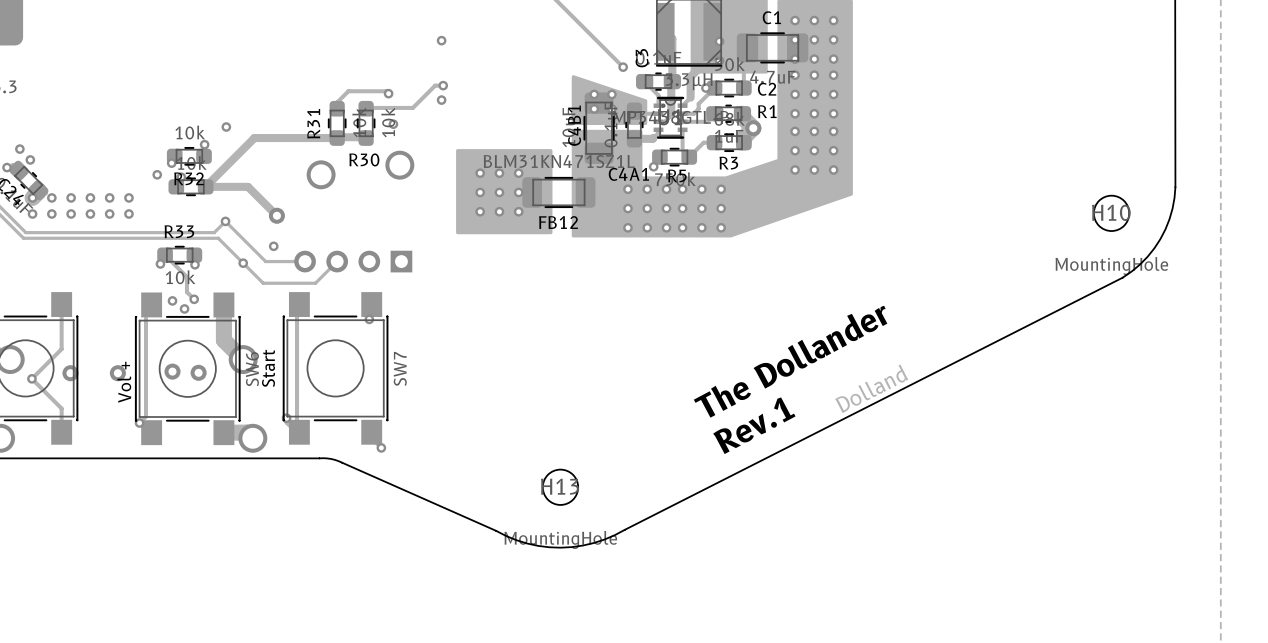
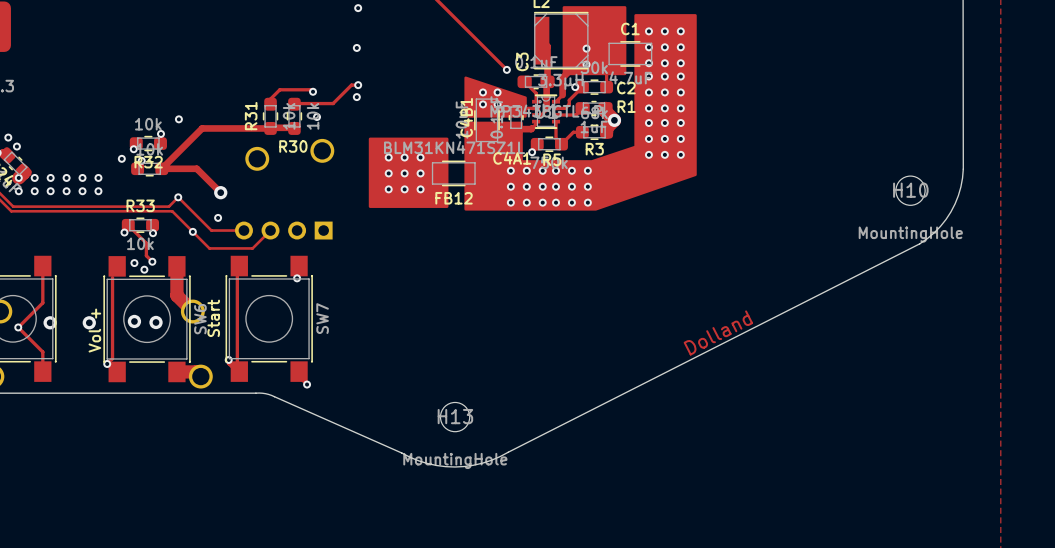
text: The Dollander (790, 361) -> none
text: Rev.1 (754, 425) -> none

